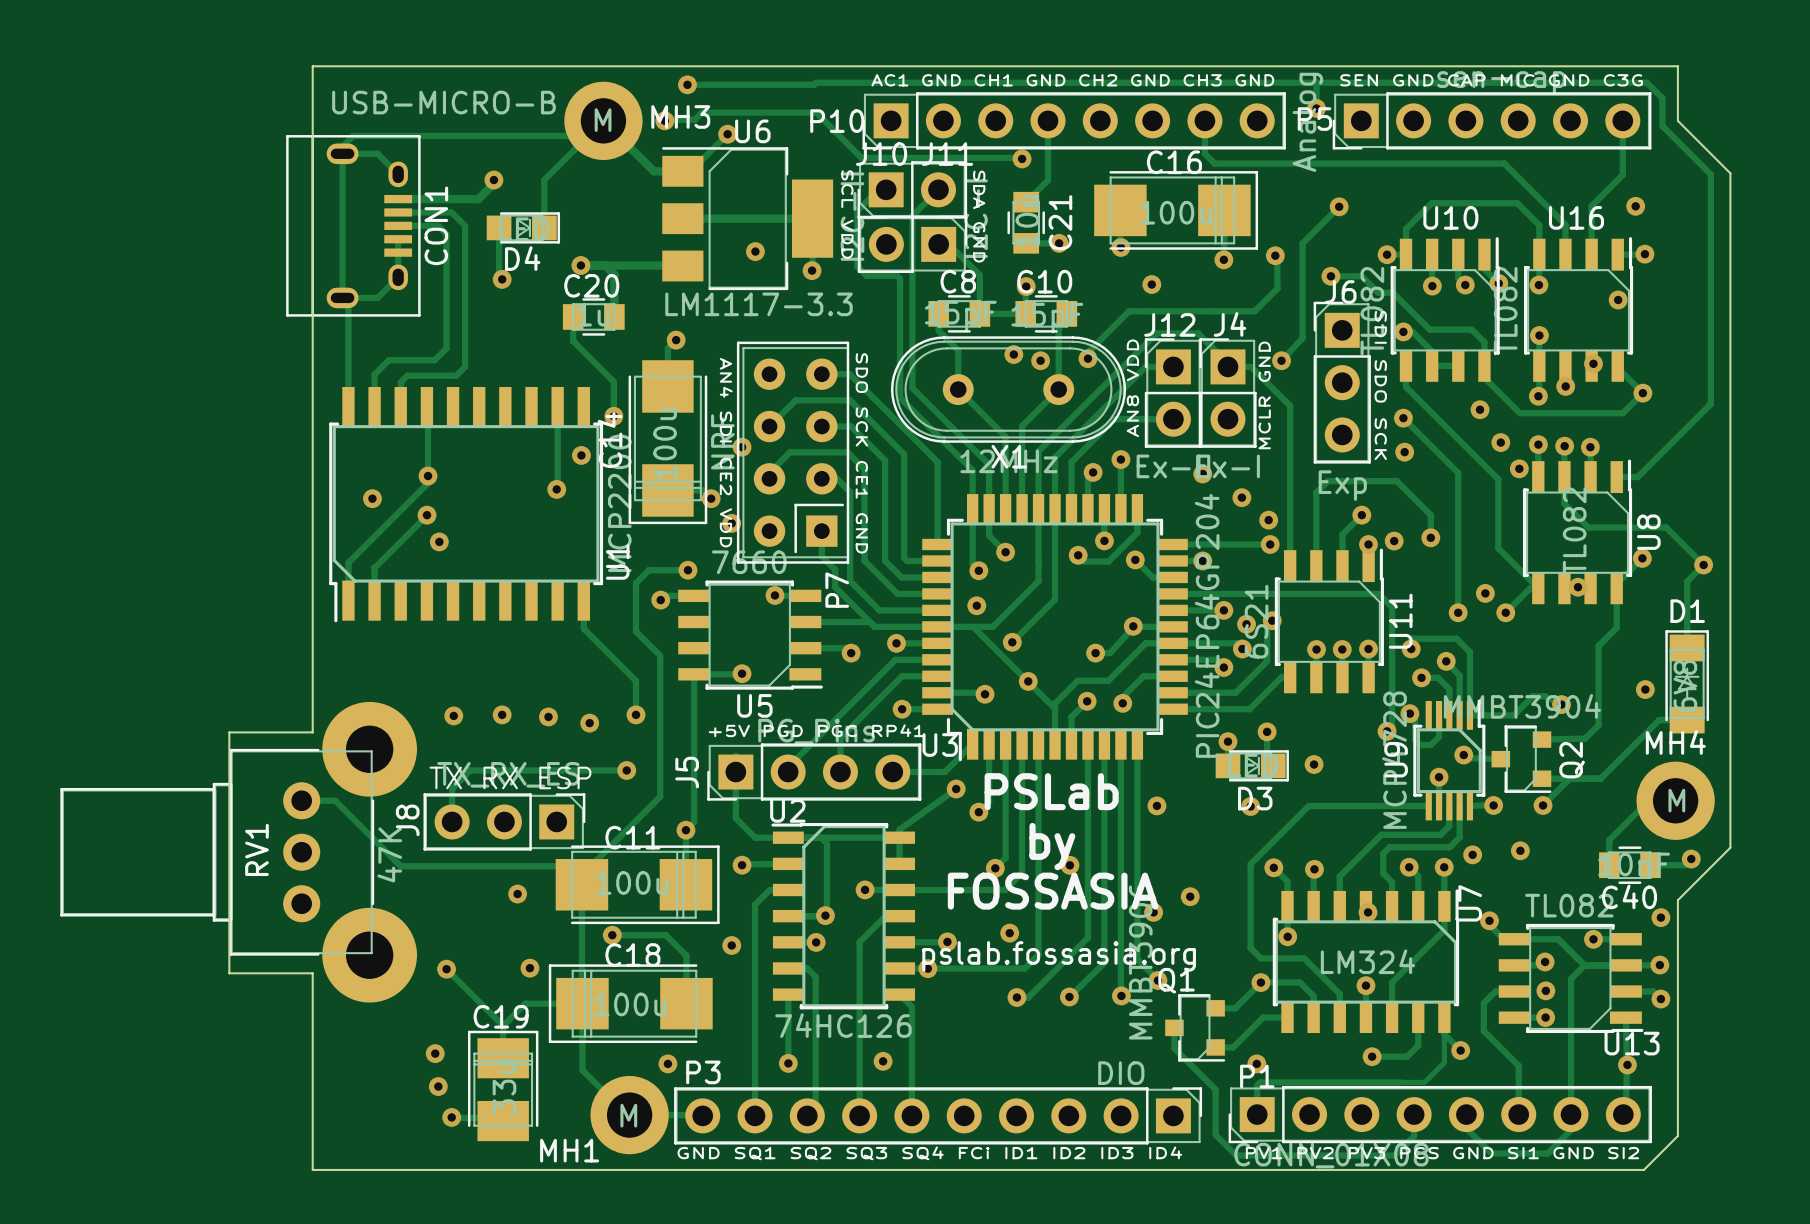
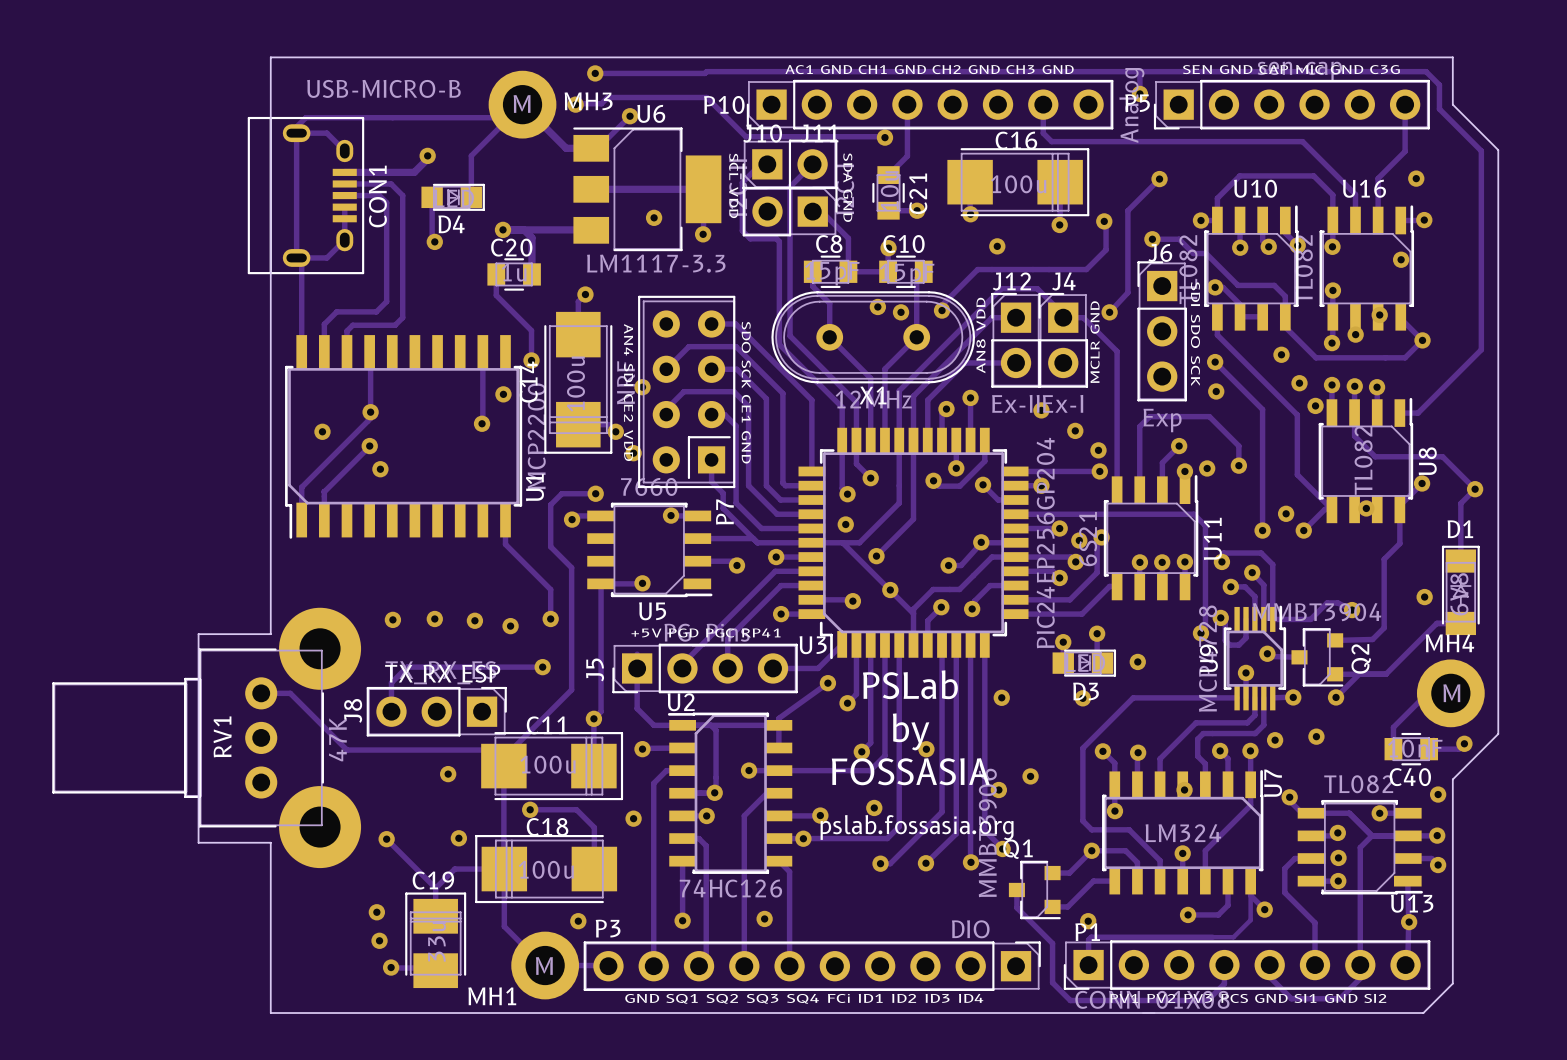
U3 value: PIC24EP64GP204 (1207, 625) -> PIC24EP256GP204 (1045, 543)

